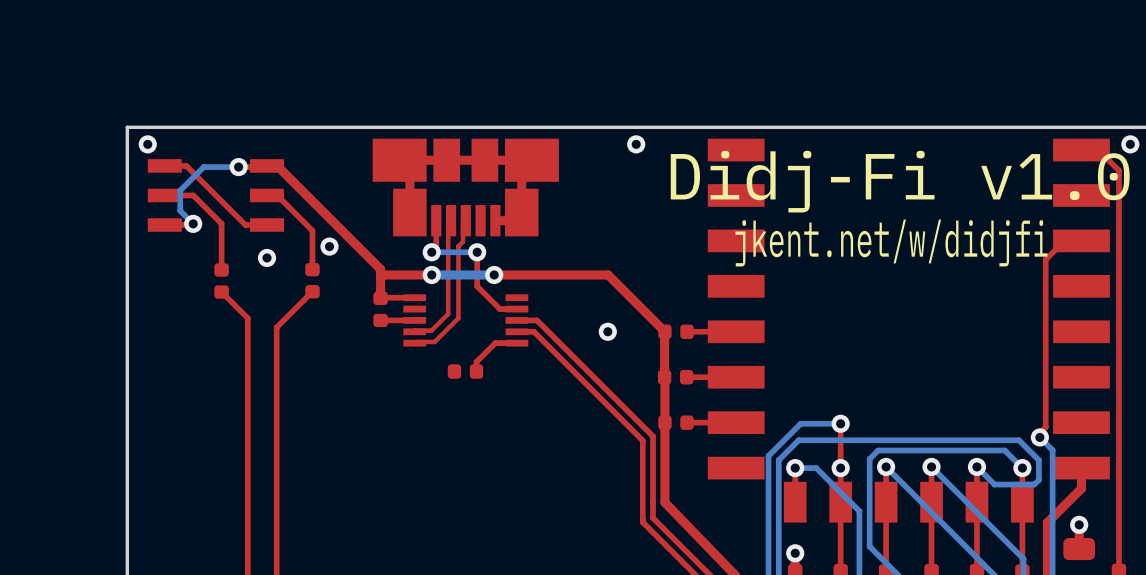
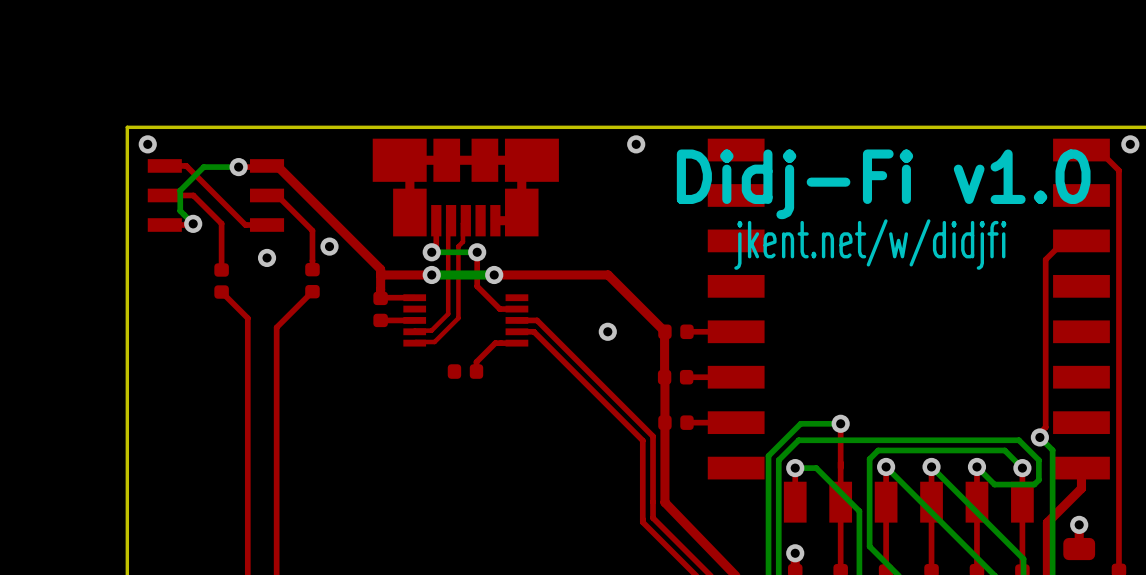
via: (840, 468) -> none

